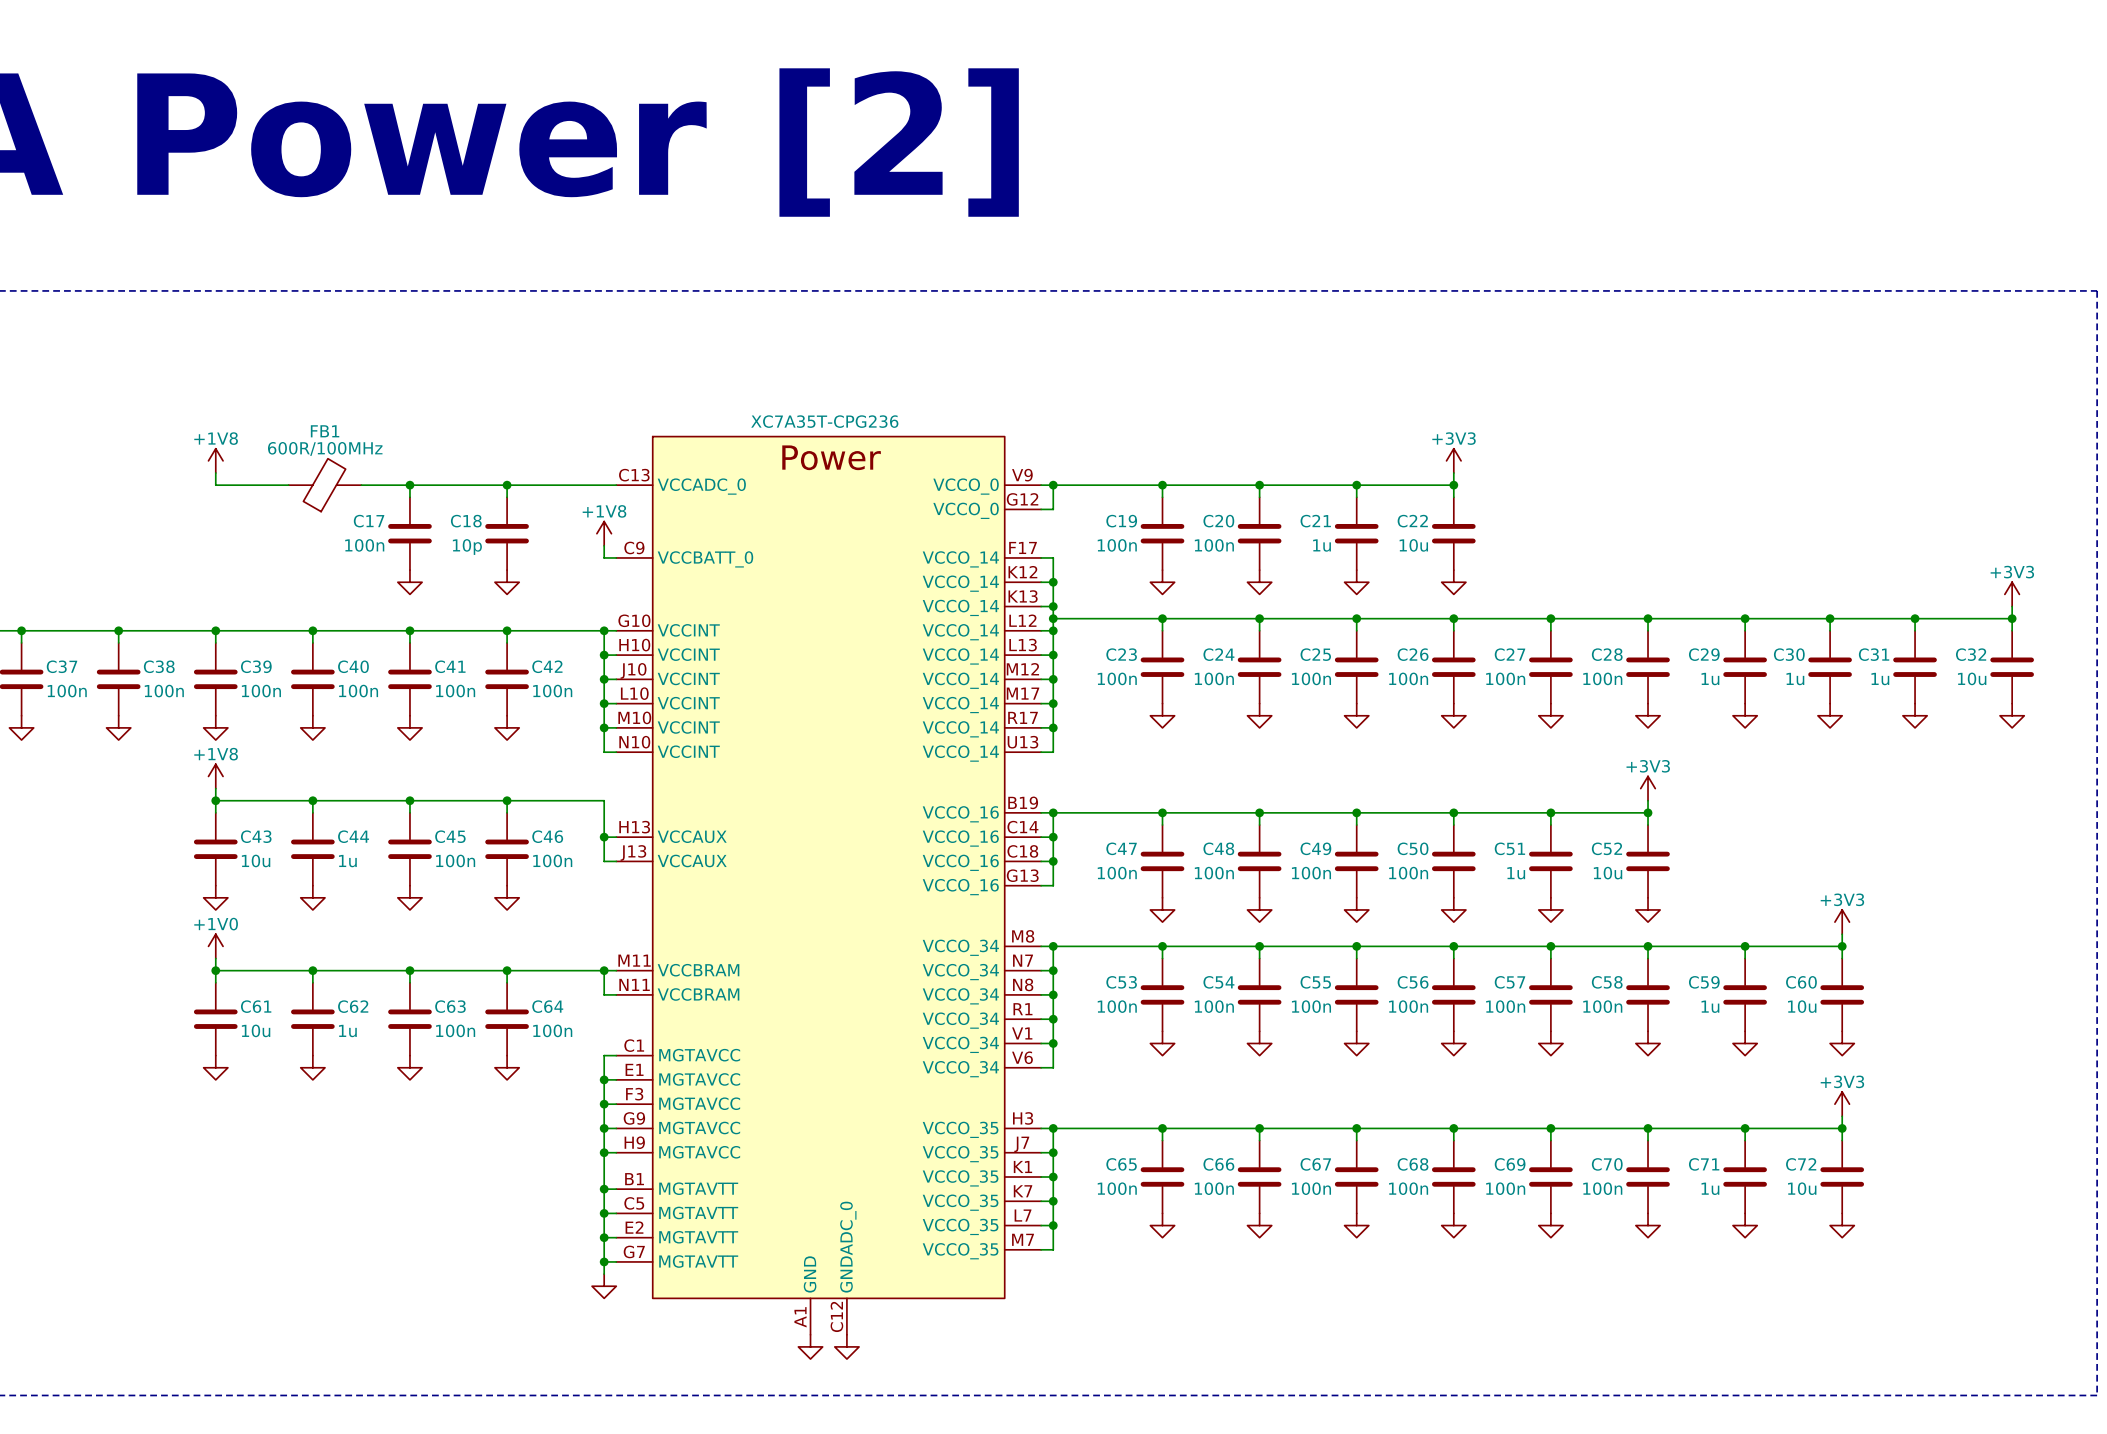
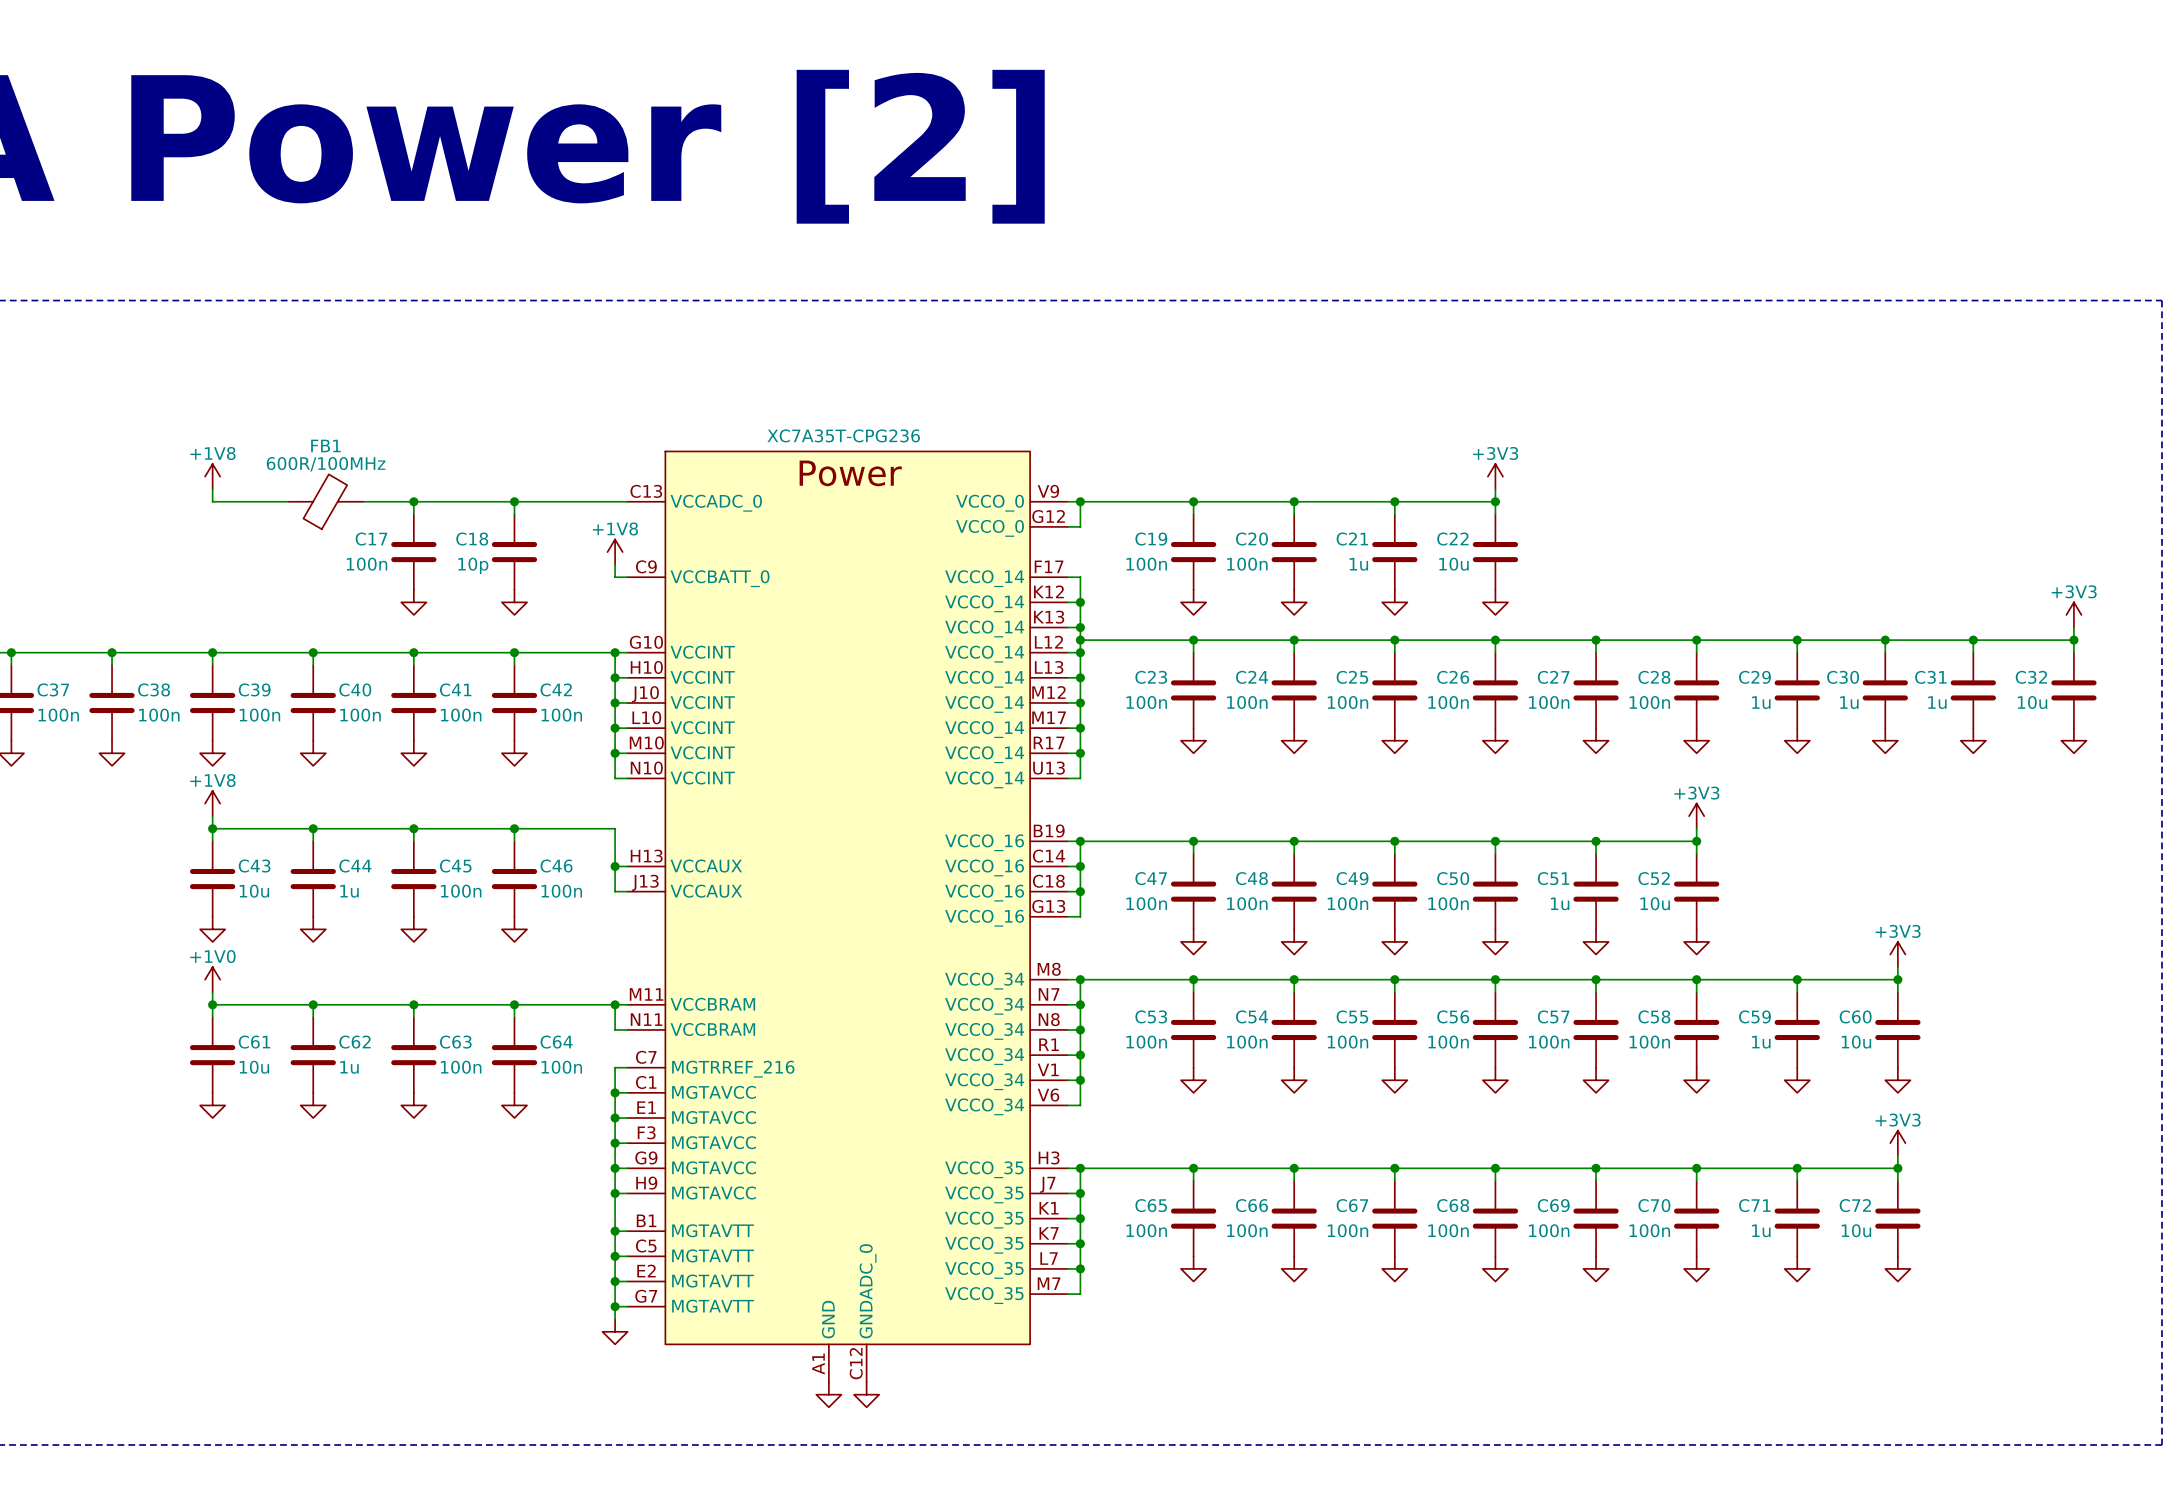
part symbol: [616, 436, 1042, 1335] -> [627, 451, 1068, 1383]
wire: none -> (627, 1067) (615, 1067) (615, 1092)
junction: none -> (615, 1092)

